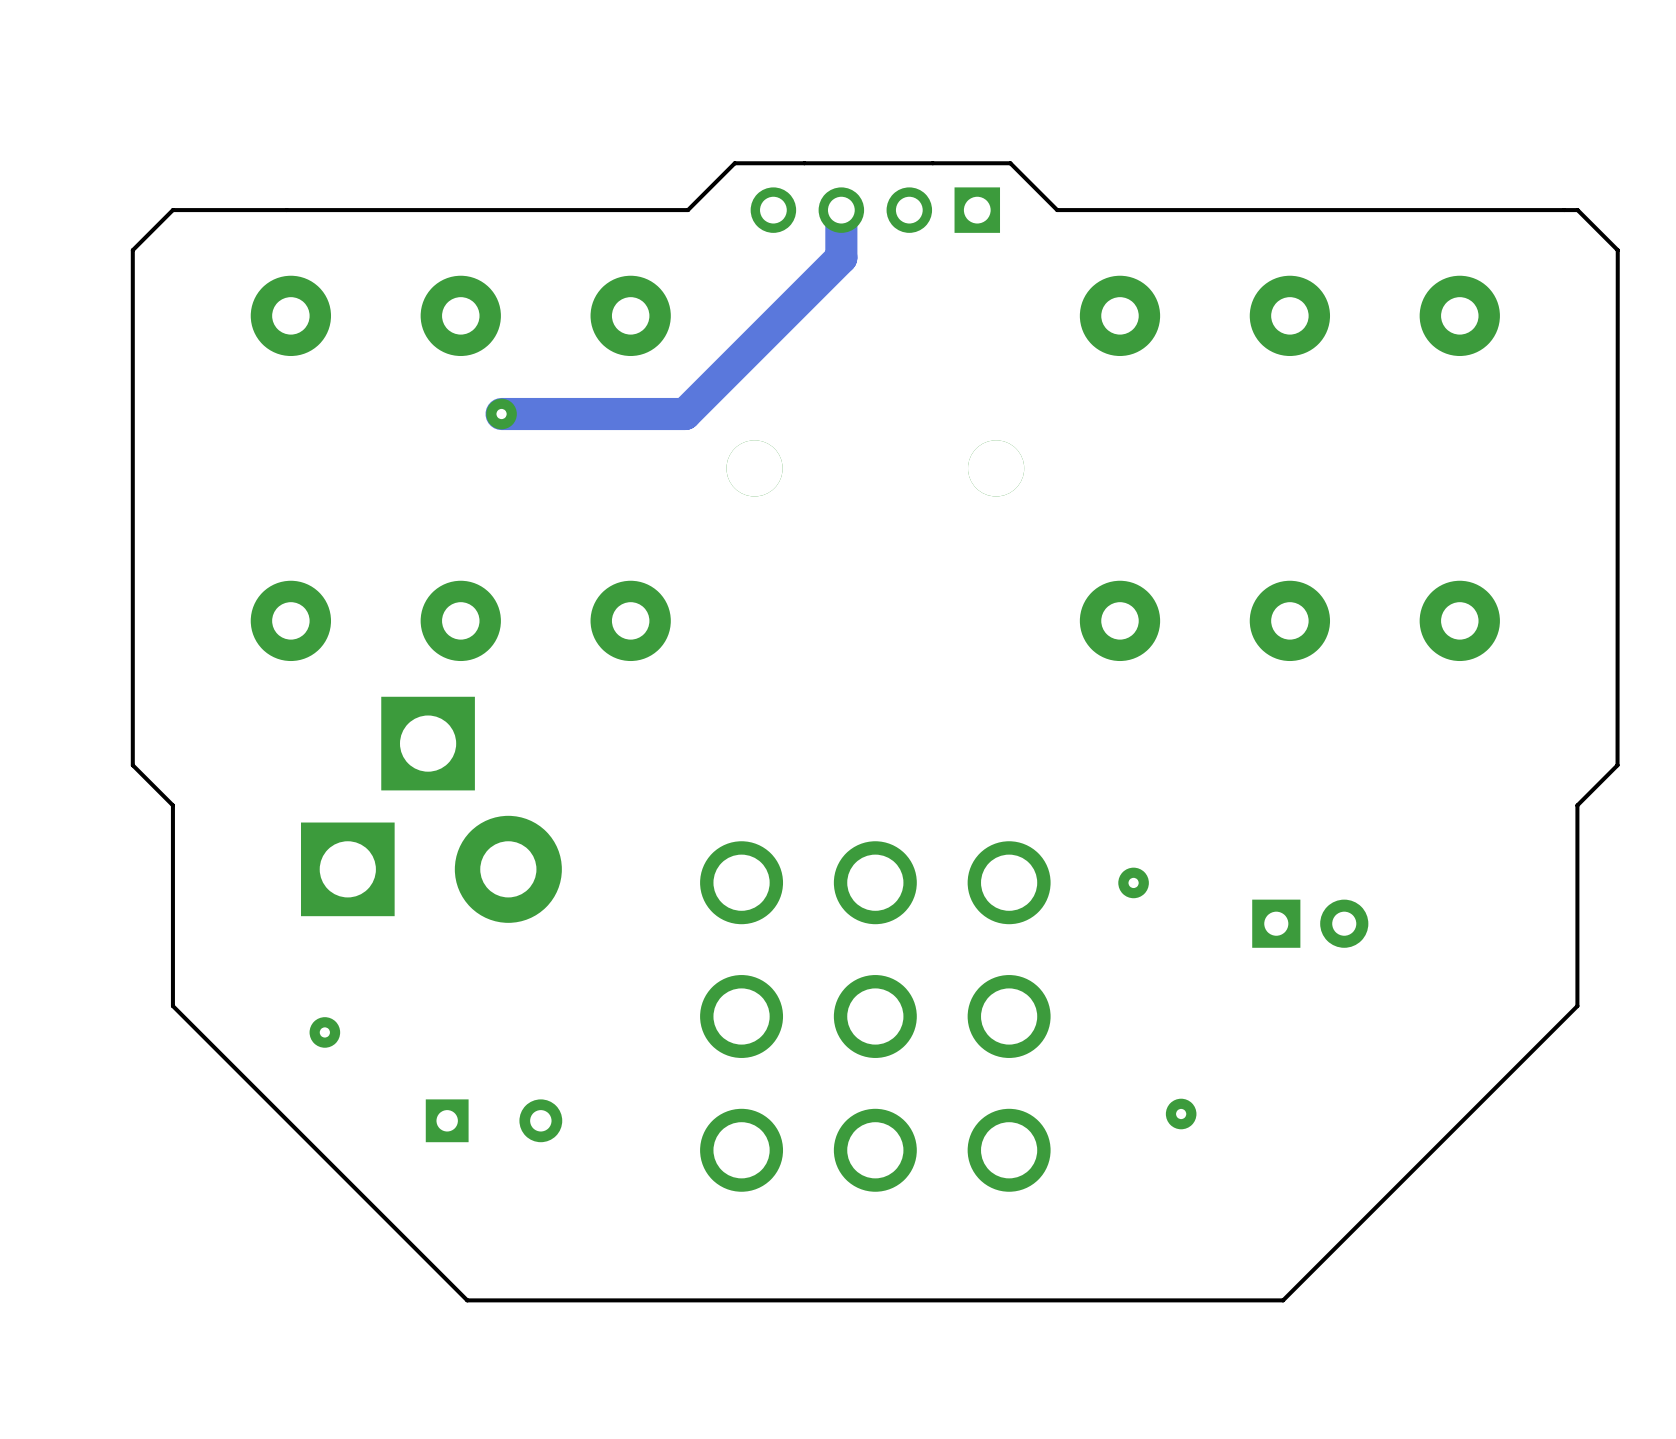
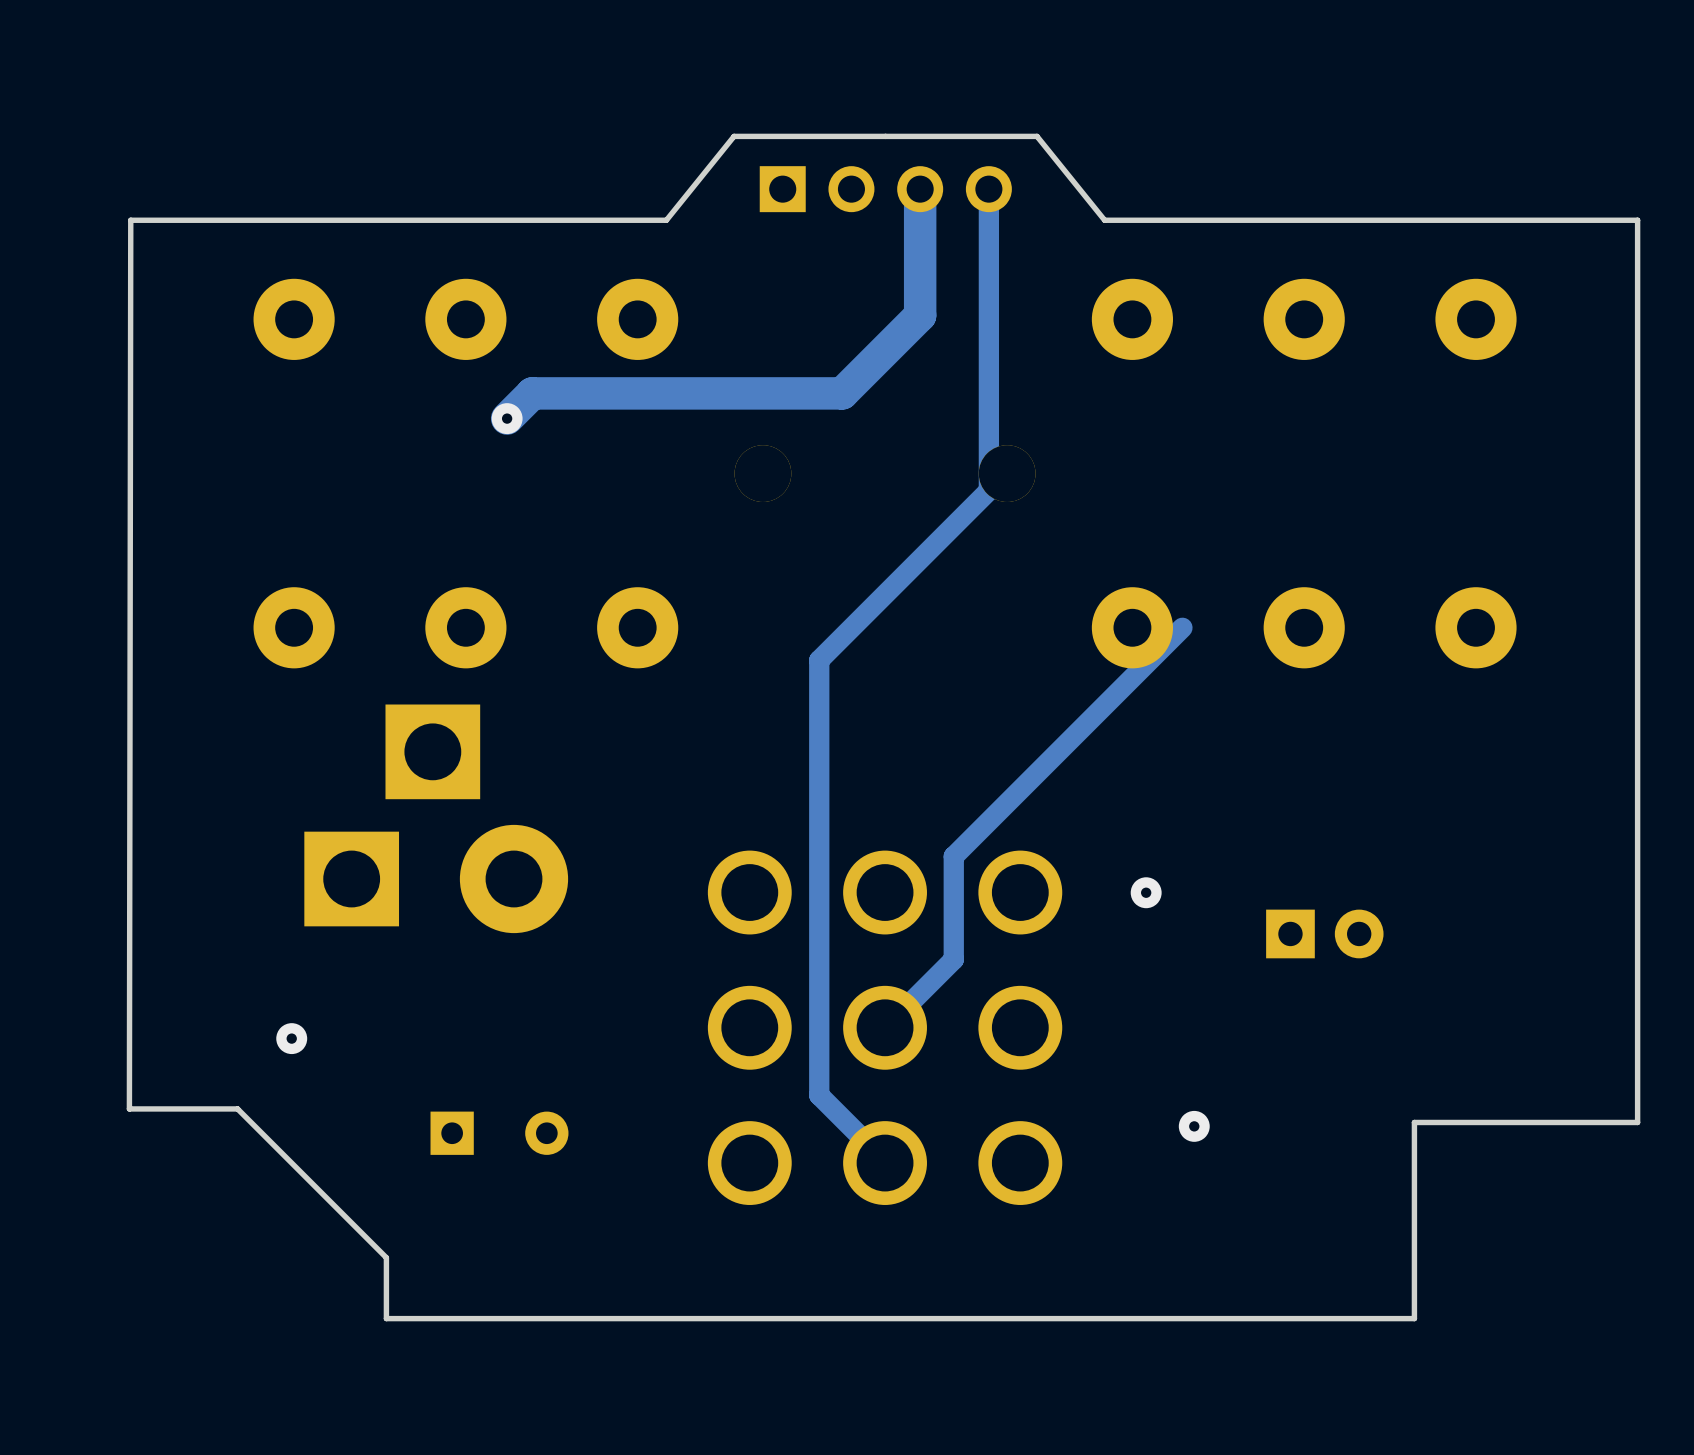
board edge: (1010, 163) (734, 163) (687, 210) (172, 210) (132, 250) (132, 765) (172, 805) (172, 1006) (467, 1300) (1283, 1300) (1577, 1006) (1577, 805) (1617, 765) (1617, 250) (1577, 210) (1057, 210) (1010, 163) -> (1037, 136) (1104, 220) (1637, 220) (1637, 1122) (1414, 1122) (1414, 1318) (386, 1318) (386, 1257) (237, 1108) (129, 1108) (130, 220) (666, 220) (734, 136) (1037, 136)
track: none -> (988, 189) (988, 490) (819, 660) (819, 1095) (887, 1163)
track: (841, 210) (841, 257) (685, 414) (501, 414) -> (920, 189) (920, 315) (842, 393) (532, 393) (507, 418)
part rotation: 0° (875, 210) -> 180° (885, 189)
track: none -> (1182, 627) (953, 856) (953, 959) (885, 1027)
via position: (324, 1032) -> (291, 1038)

